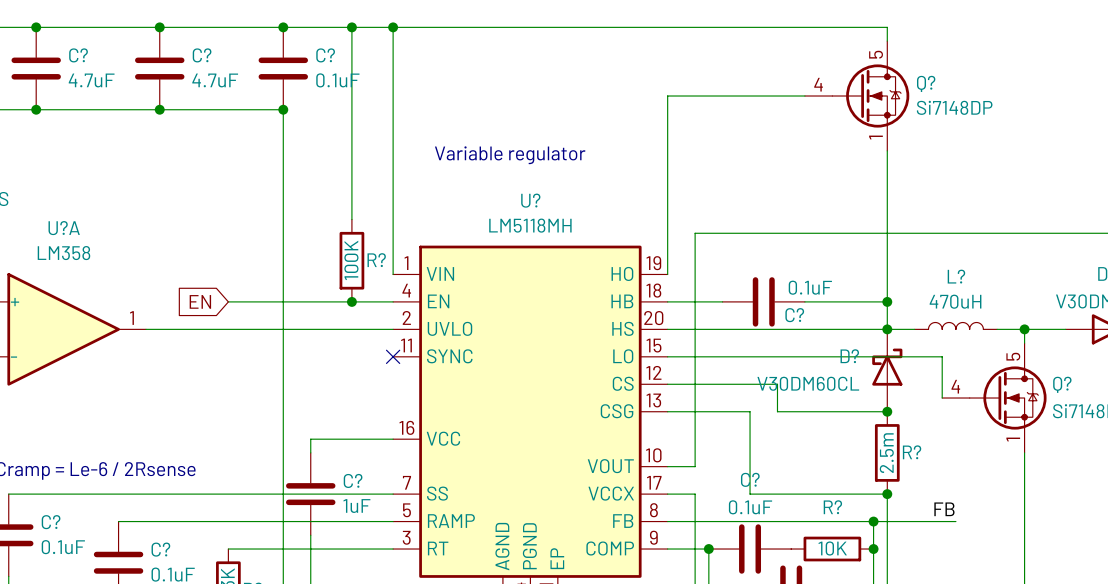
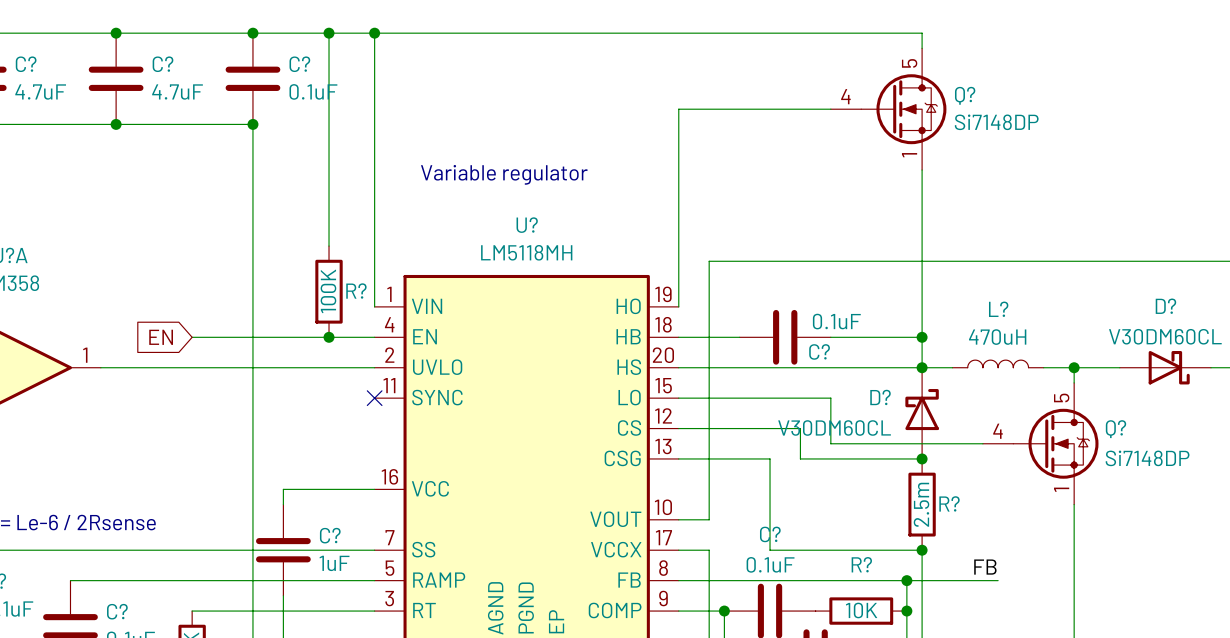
wire: (804, 356) (942, 356) (942, 398) -> (830, 398) (830, 443) (982, 443)

